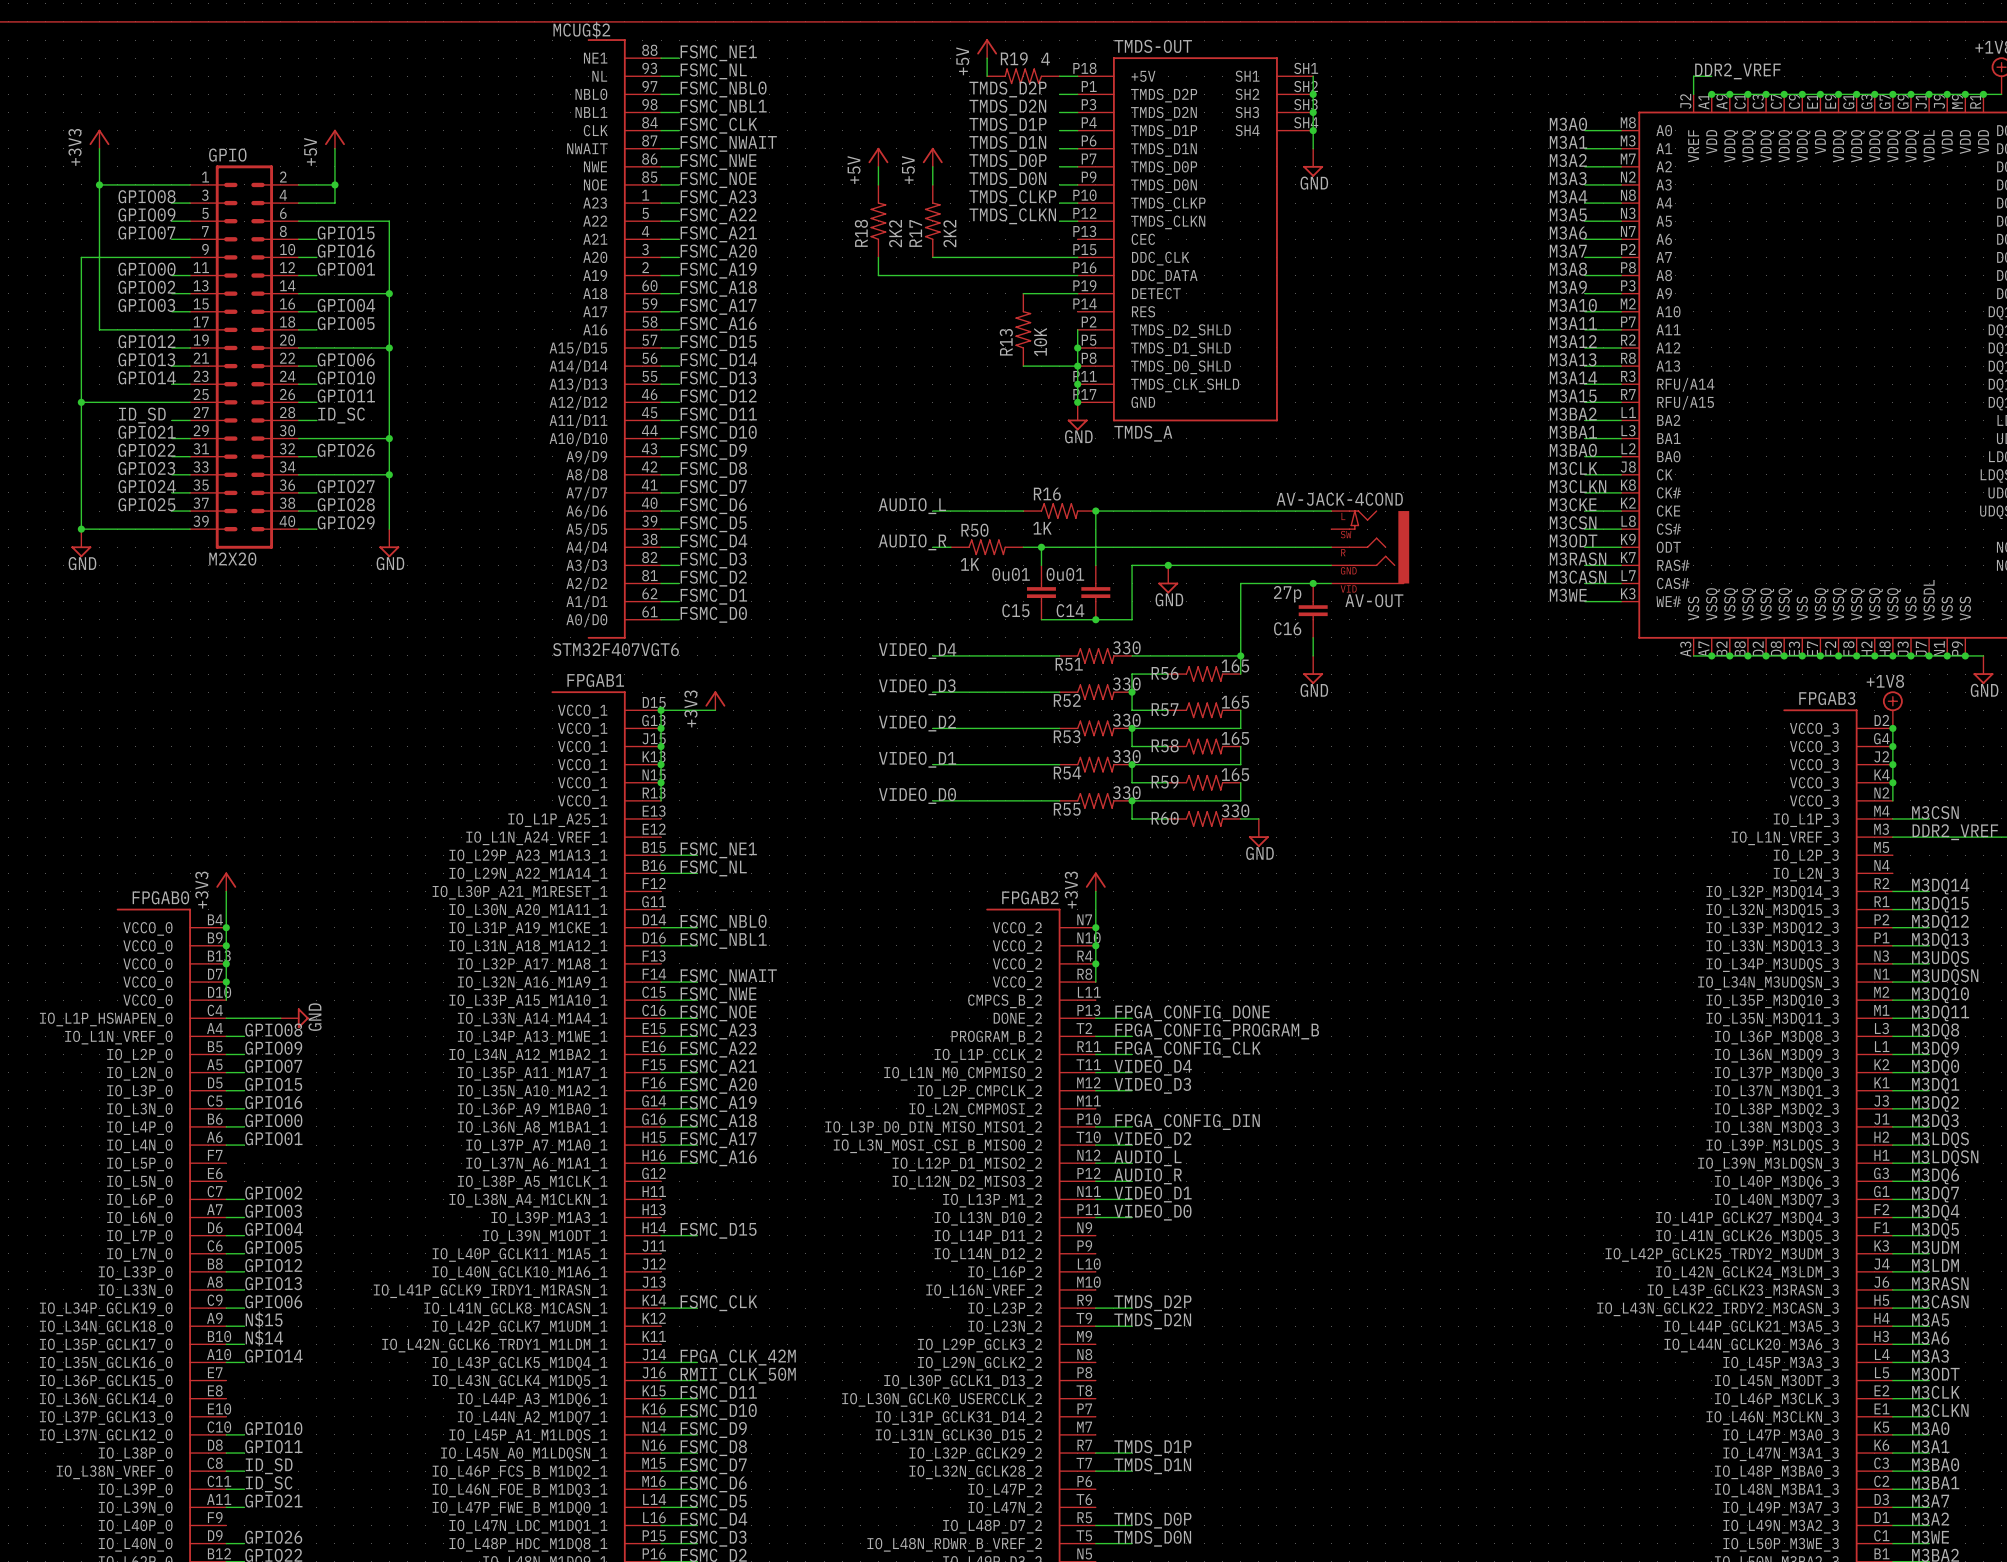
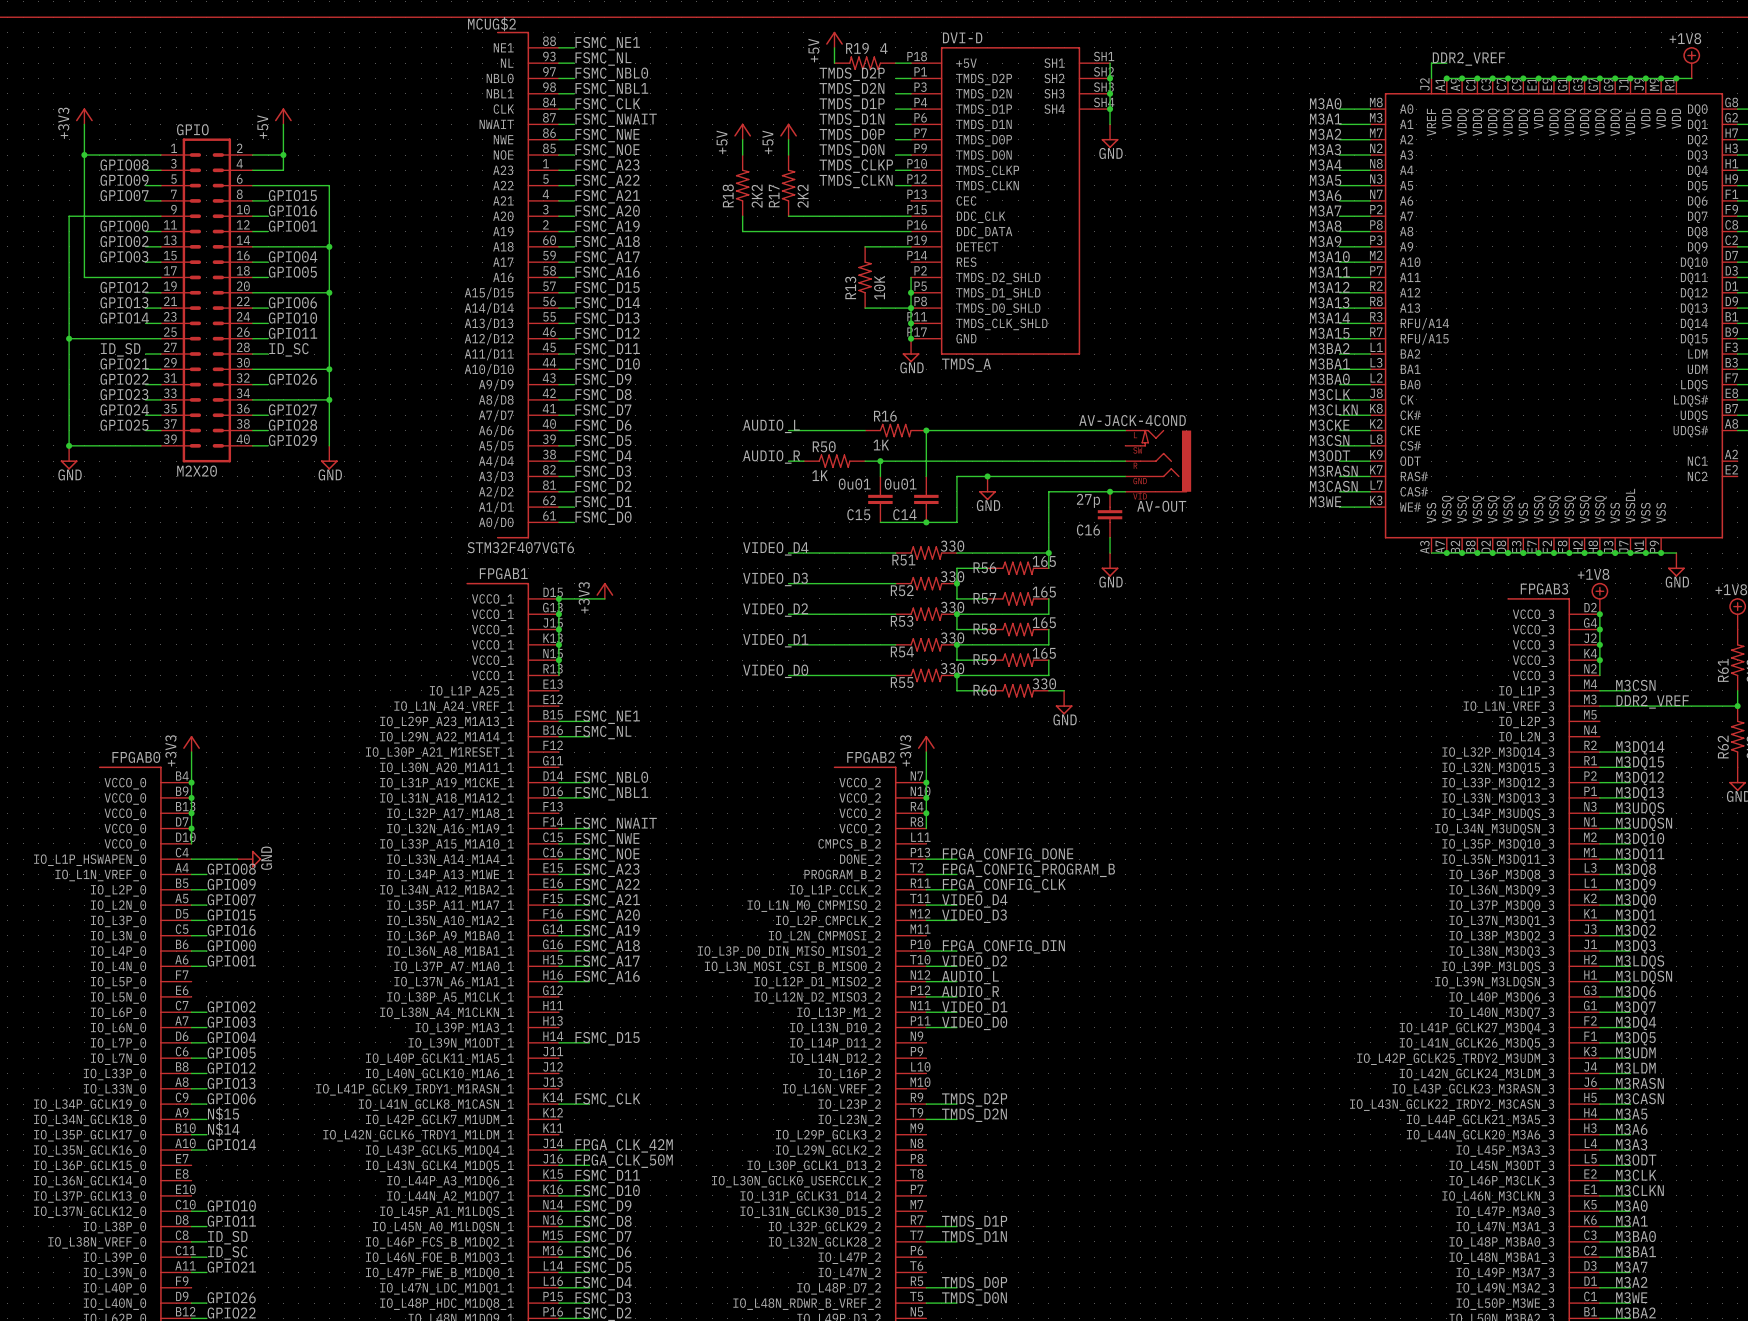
TMDS-OUT name: TMDS-OUT (1153, 46) -> DVI-D (962, 37)
label: RMII_CLK_50M (738, 1375) -> FPGA_CLK_50M (624, 1161)

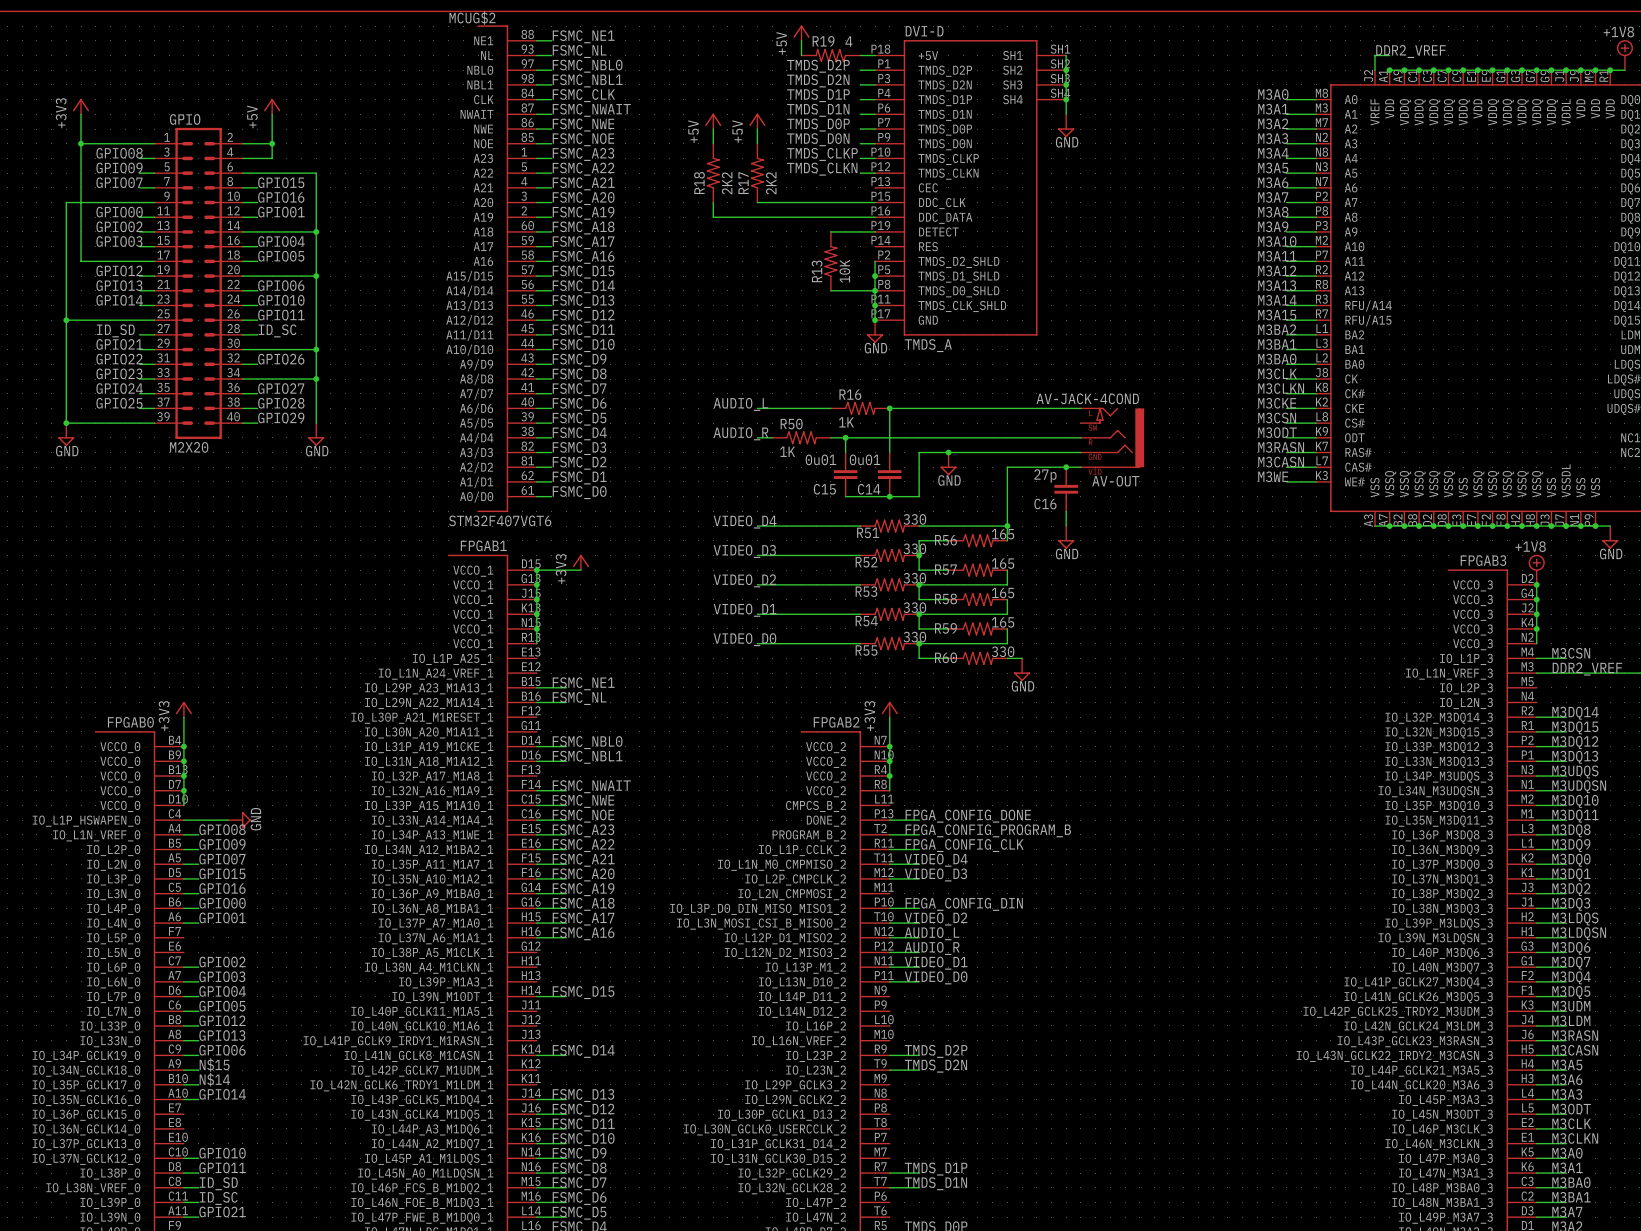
label: FSMC_CLK (607, 1099) -> FSMC_D14 (583, 1051)
label: FPGA_CLK_42M (624, 1145) -> FSMC_D13 (583, 1095)
label: FPGA_CLK_50M (624, 1161) -> FSMC_D12 (583, 1110)

